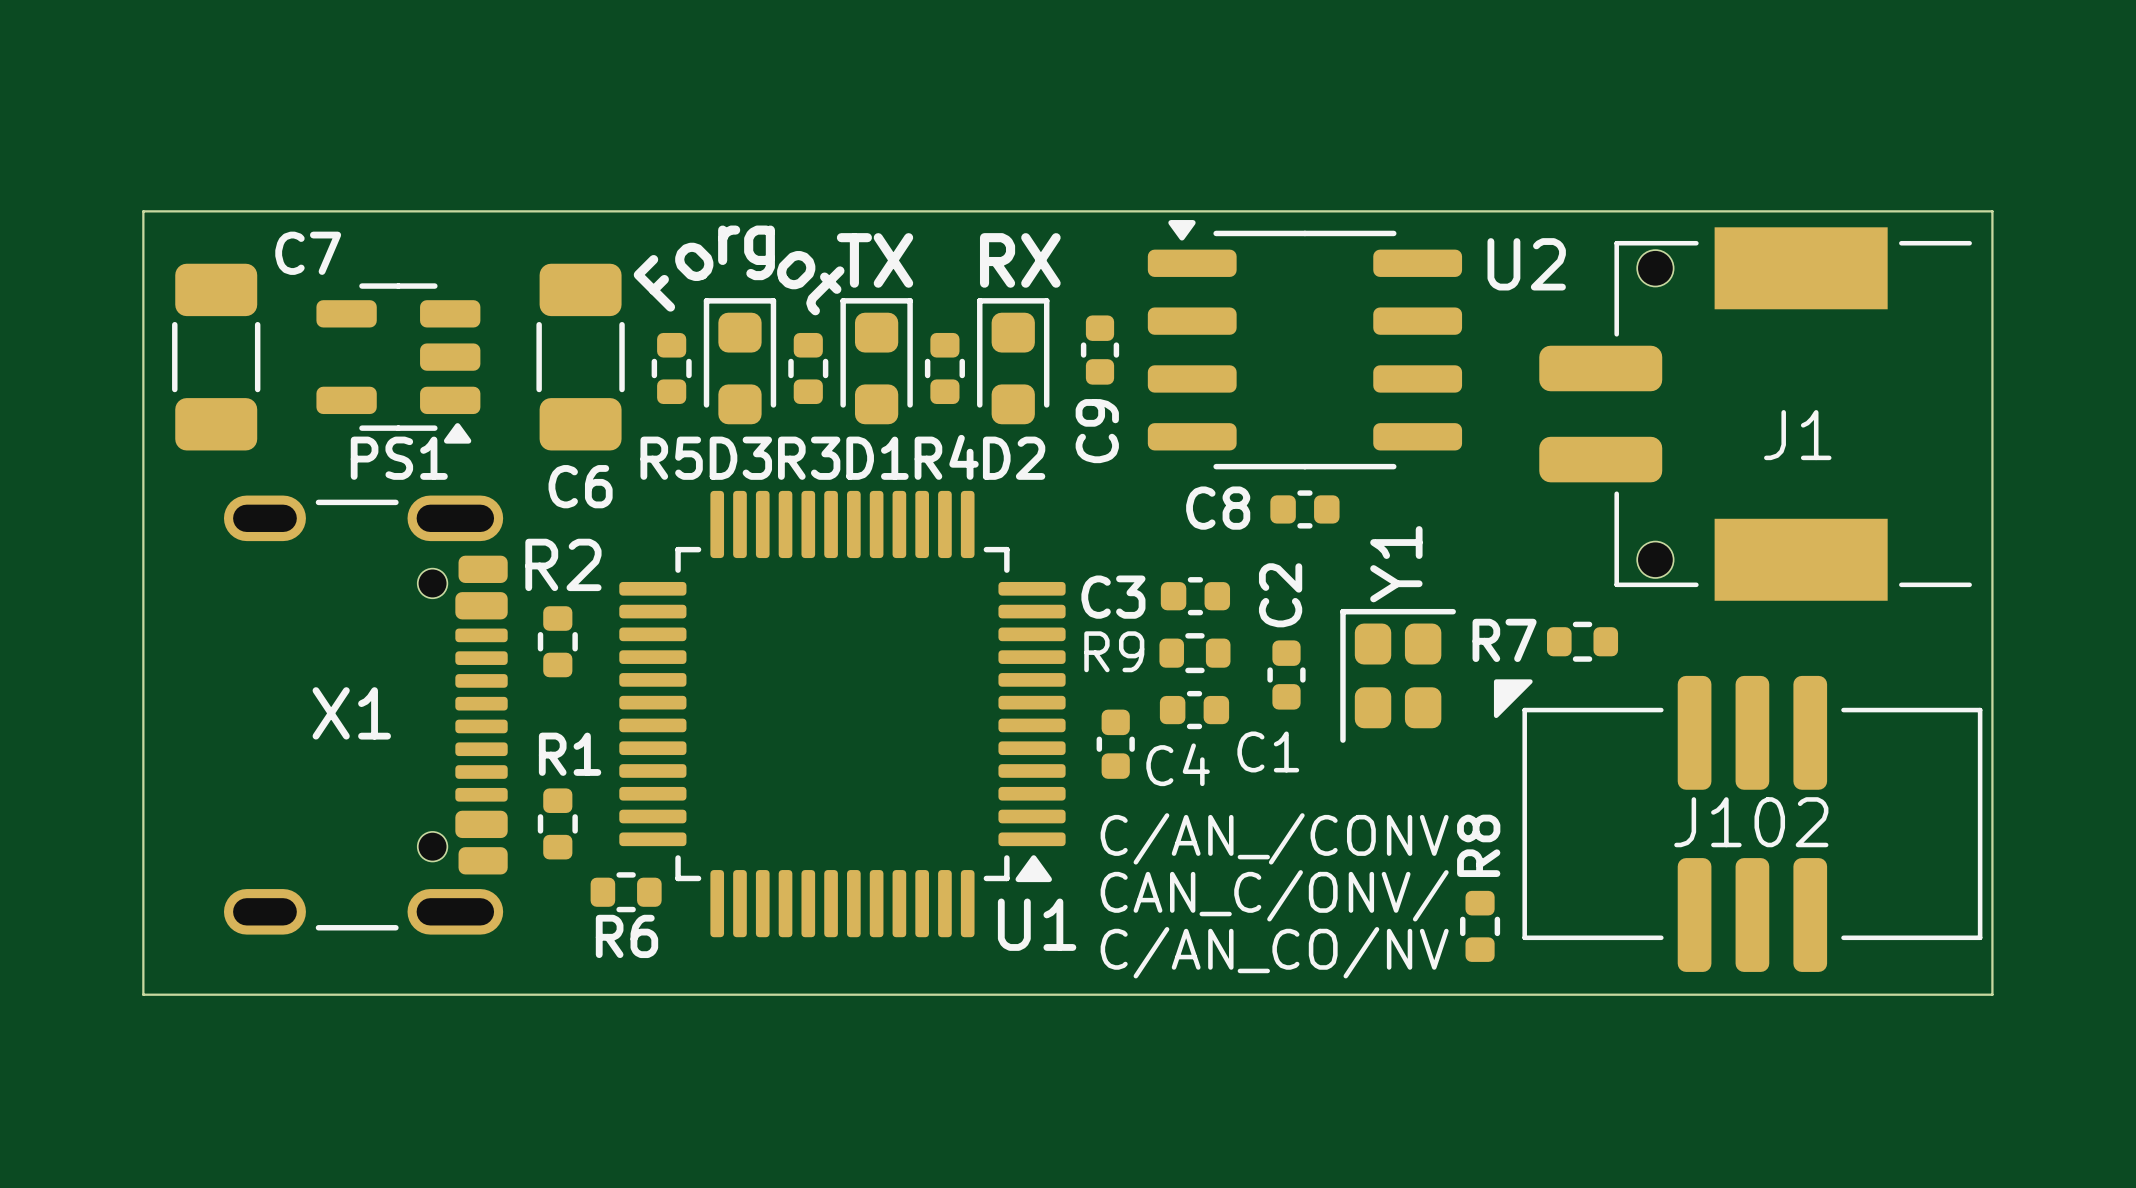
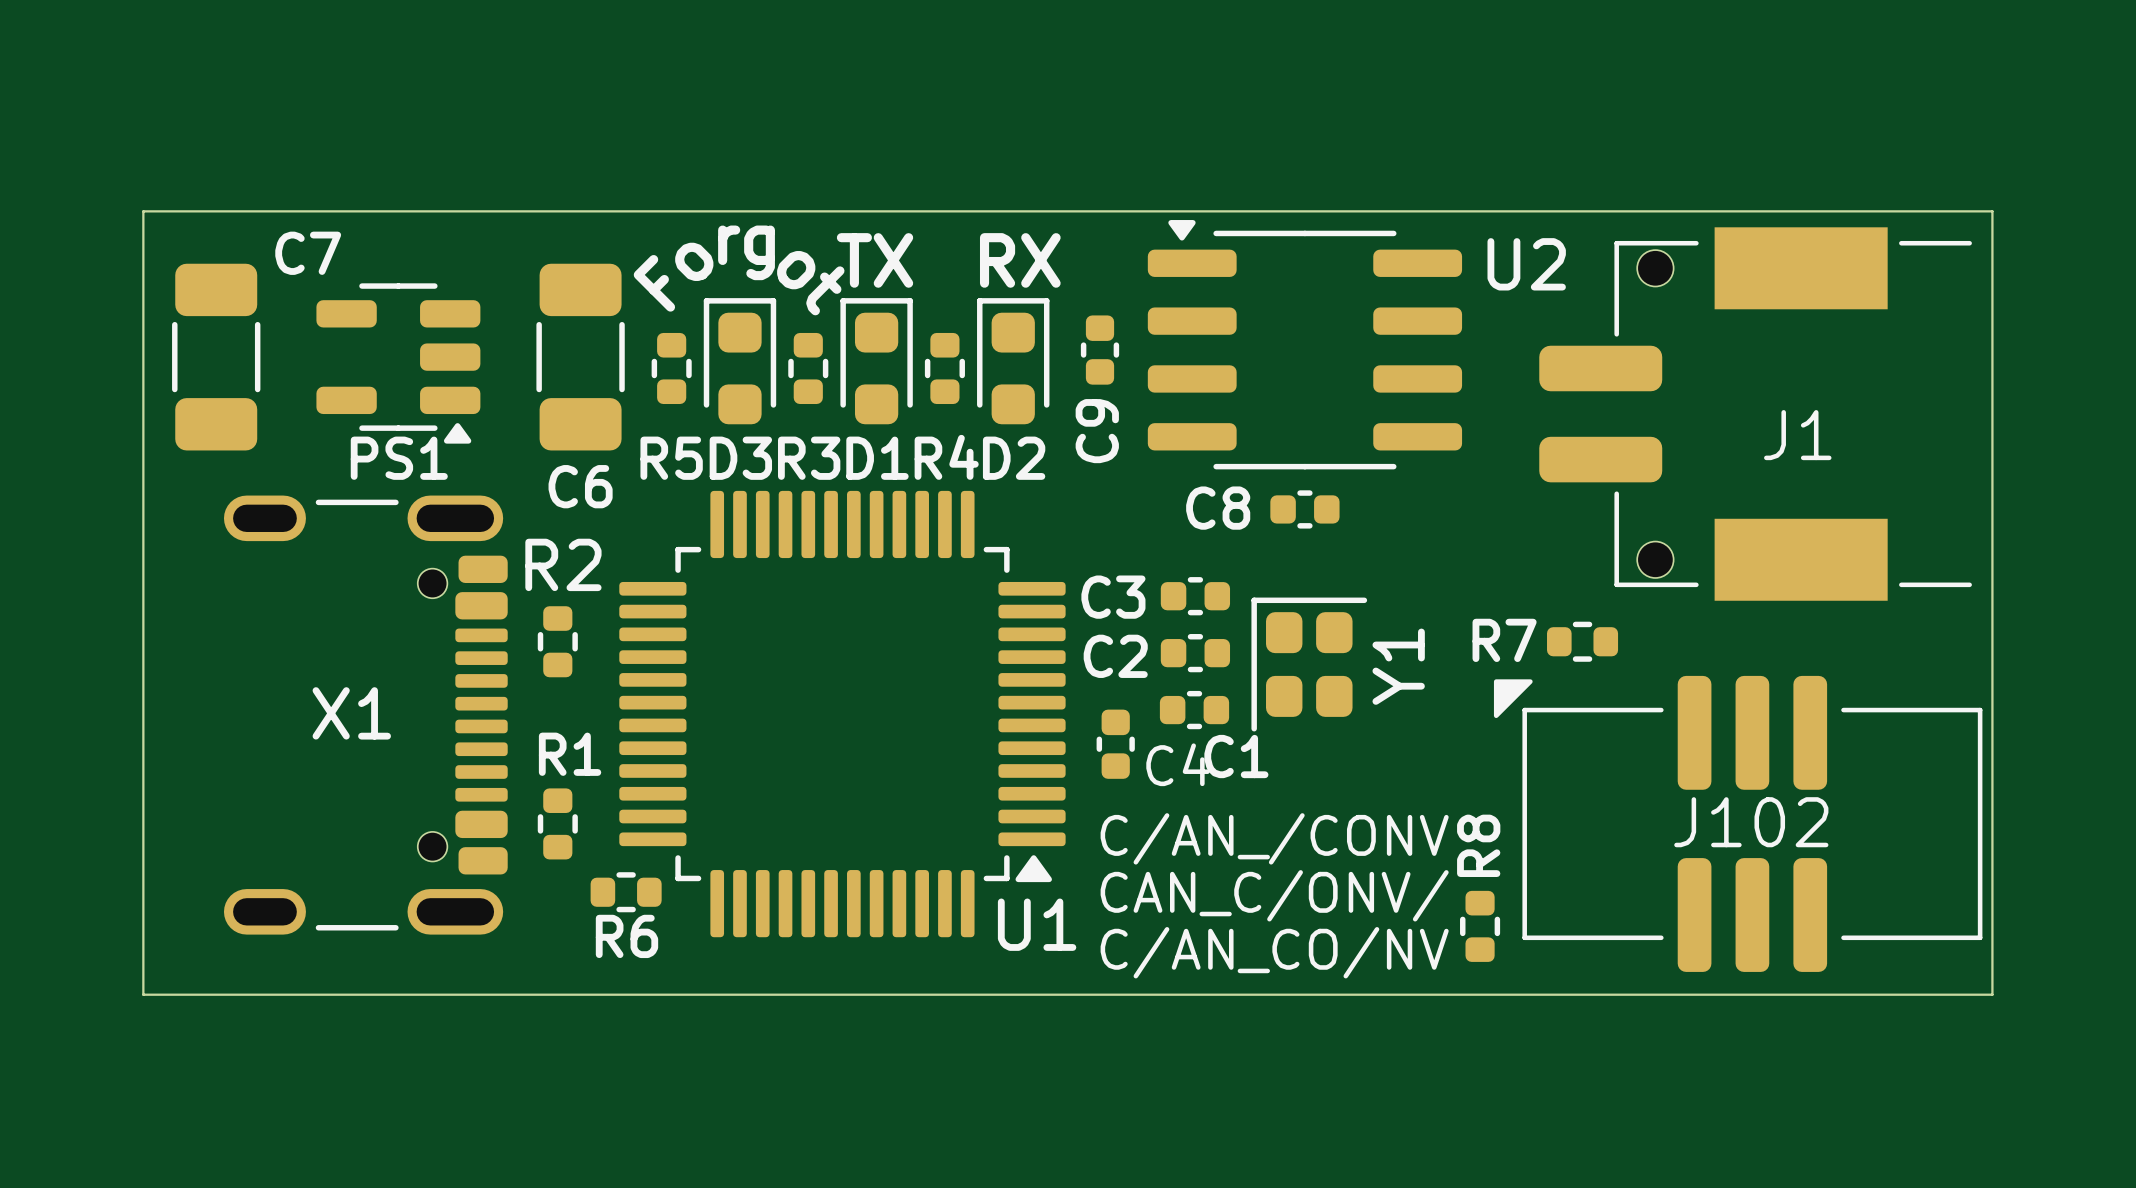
Y1 name position: Y1 (1396, 564) -> Y1 (1398, 666)
C2 name position: C2 (1280, 595) -> C2 (1115, 656)
R9: (1194, 653) -> none
C2 rotation: 0° (1286, 674) -> 90° clockwise (1195, 653)
C2 position: (1286, 674) -> (1195, 653)
Y1 position: (1398, 675) -> (1309, 664)
C1 name position: C1 (1268, 751) -> C1 (1236, 756)

